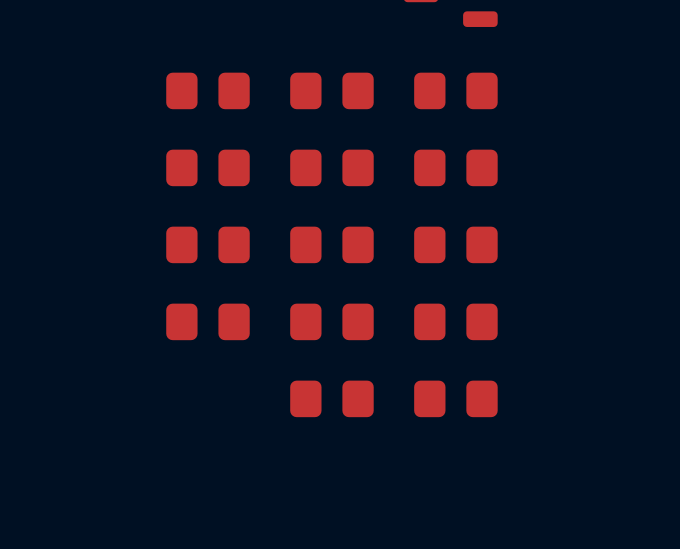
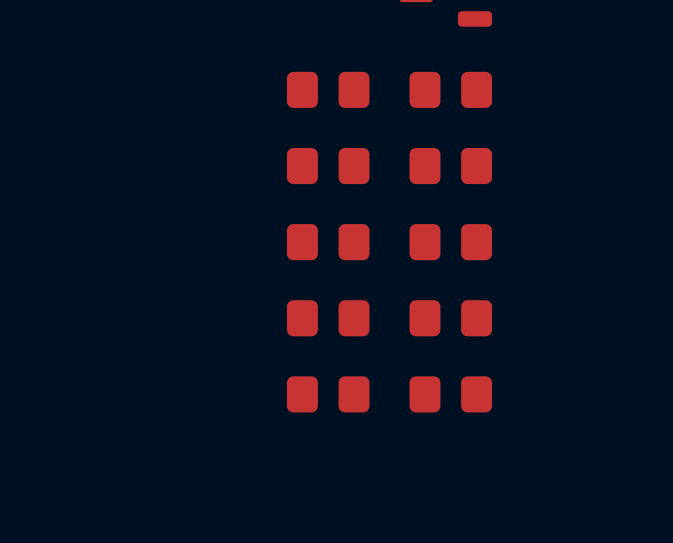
part: (207, 90) -> none
part: (207, 167) -> none
part: (207, 244) -> none
part: (207, 321) -> none

